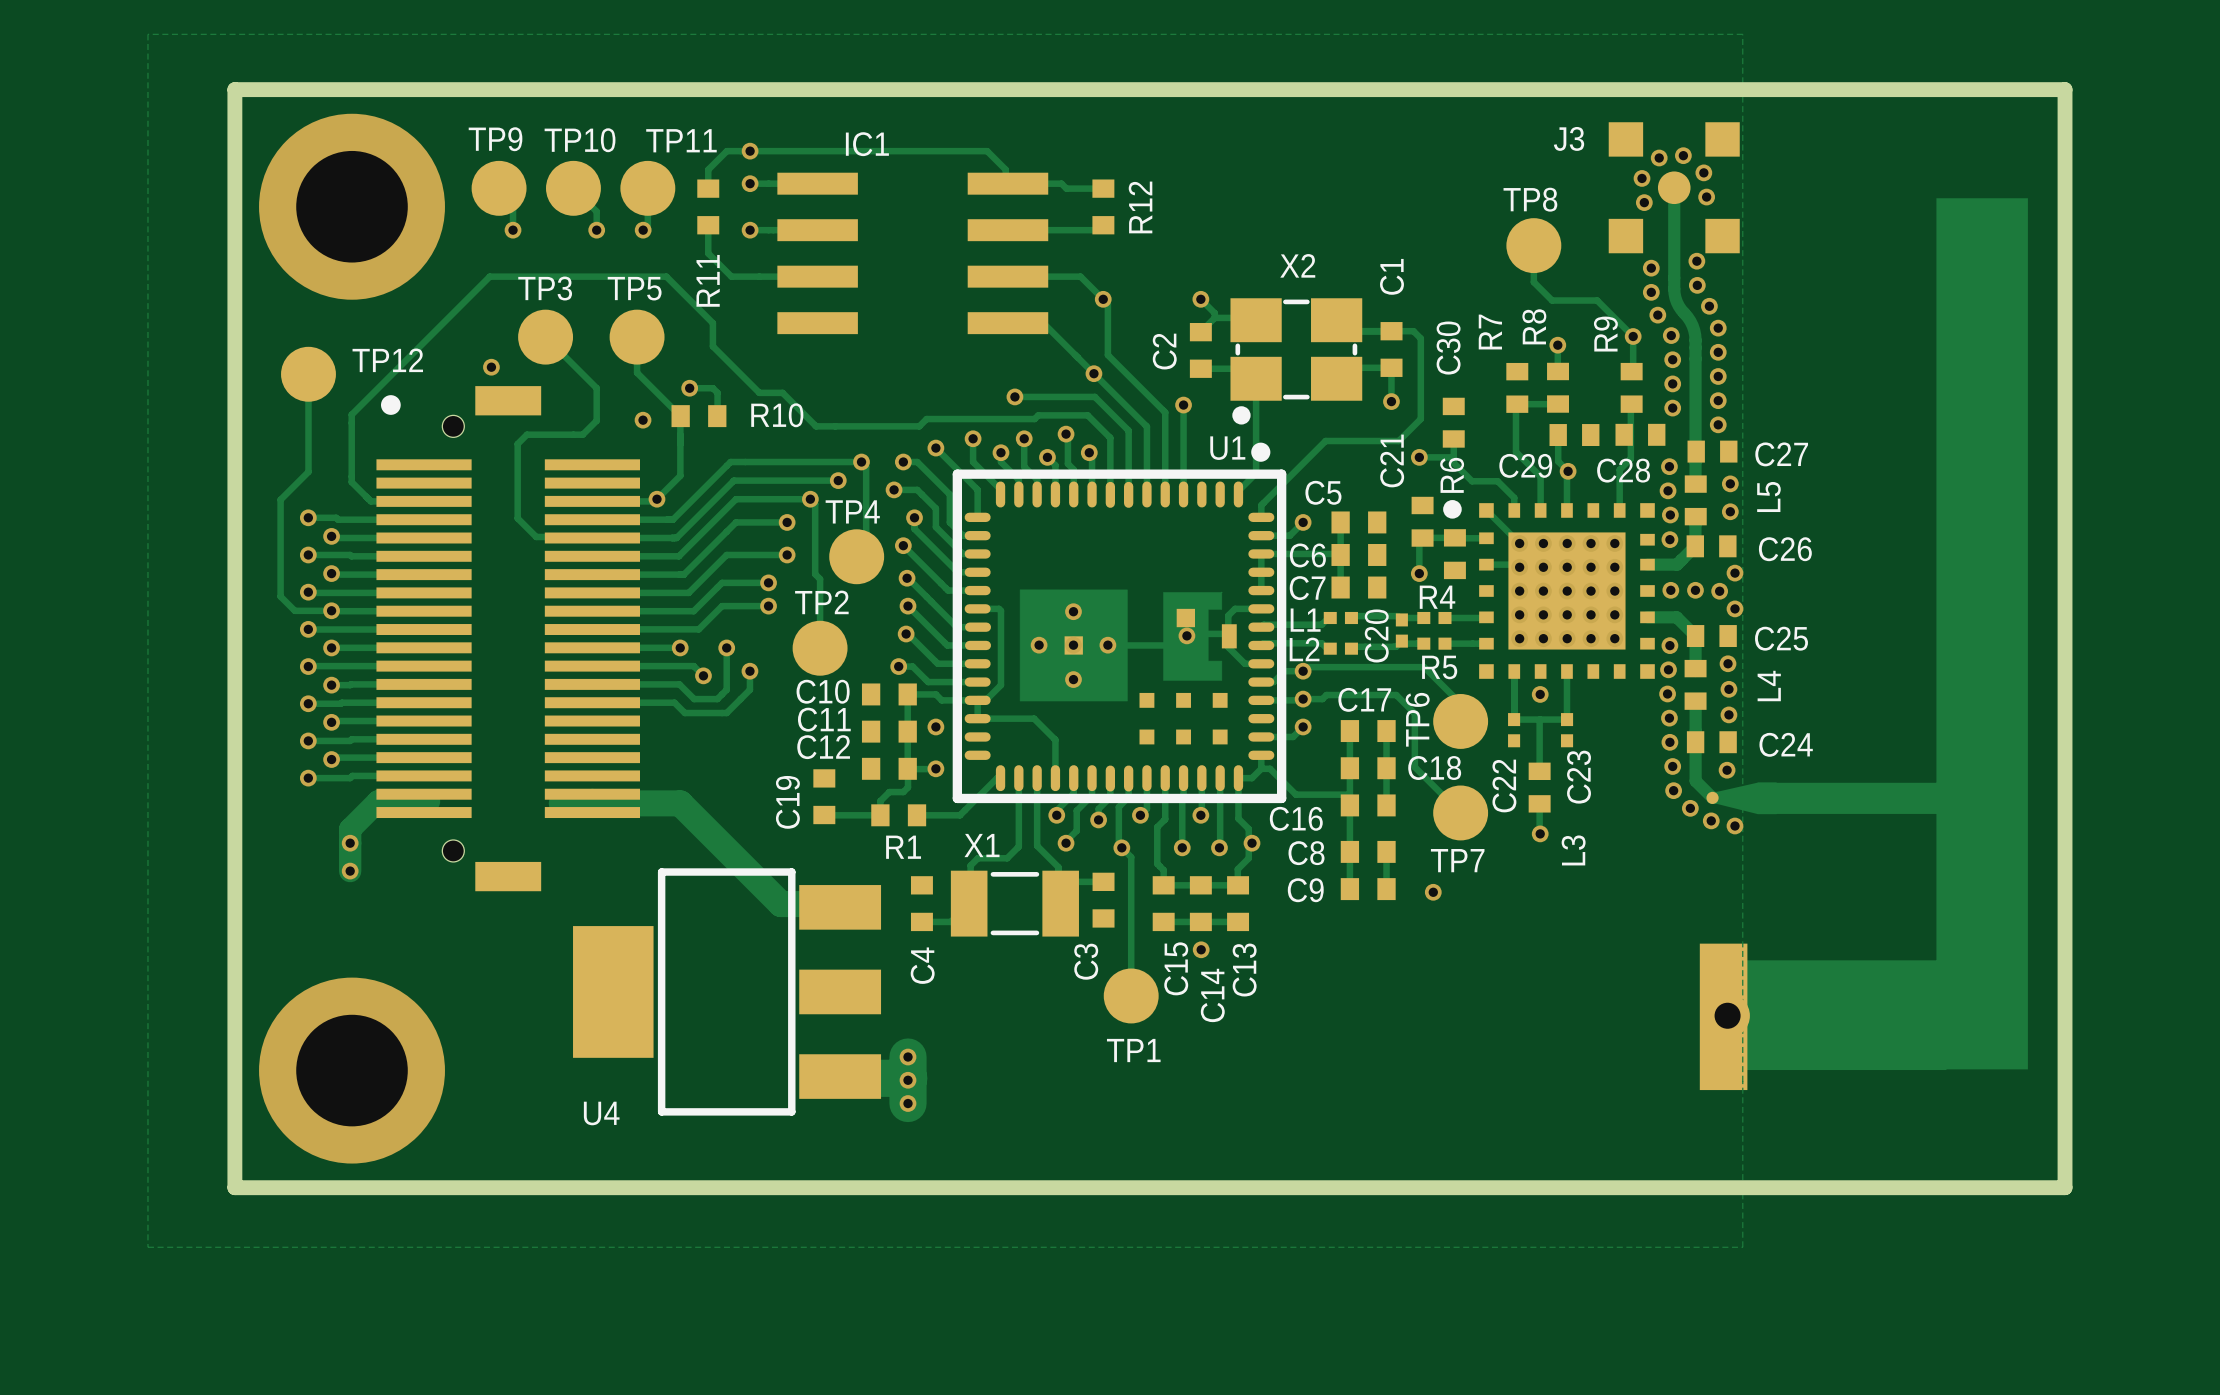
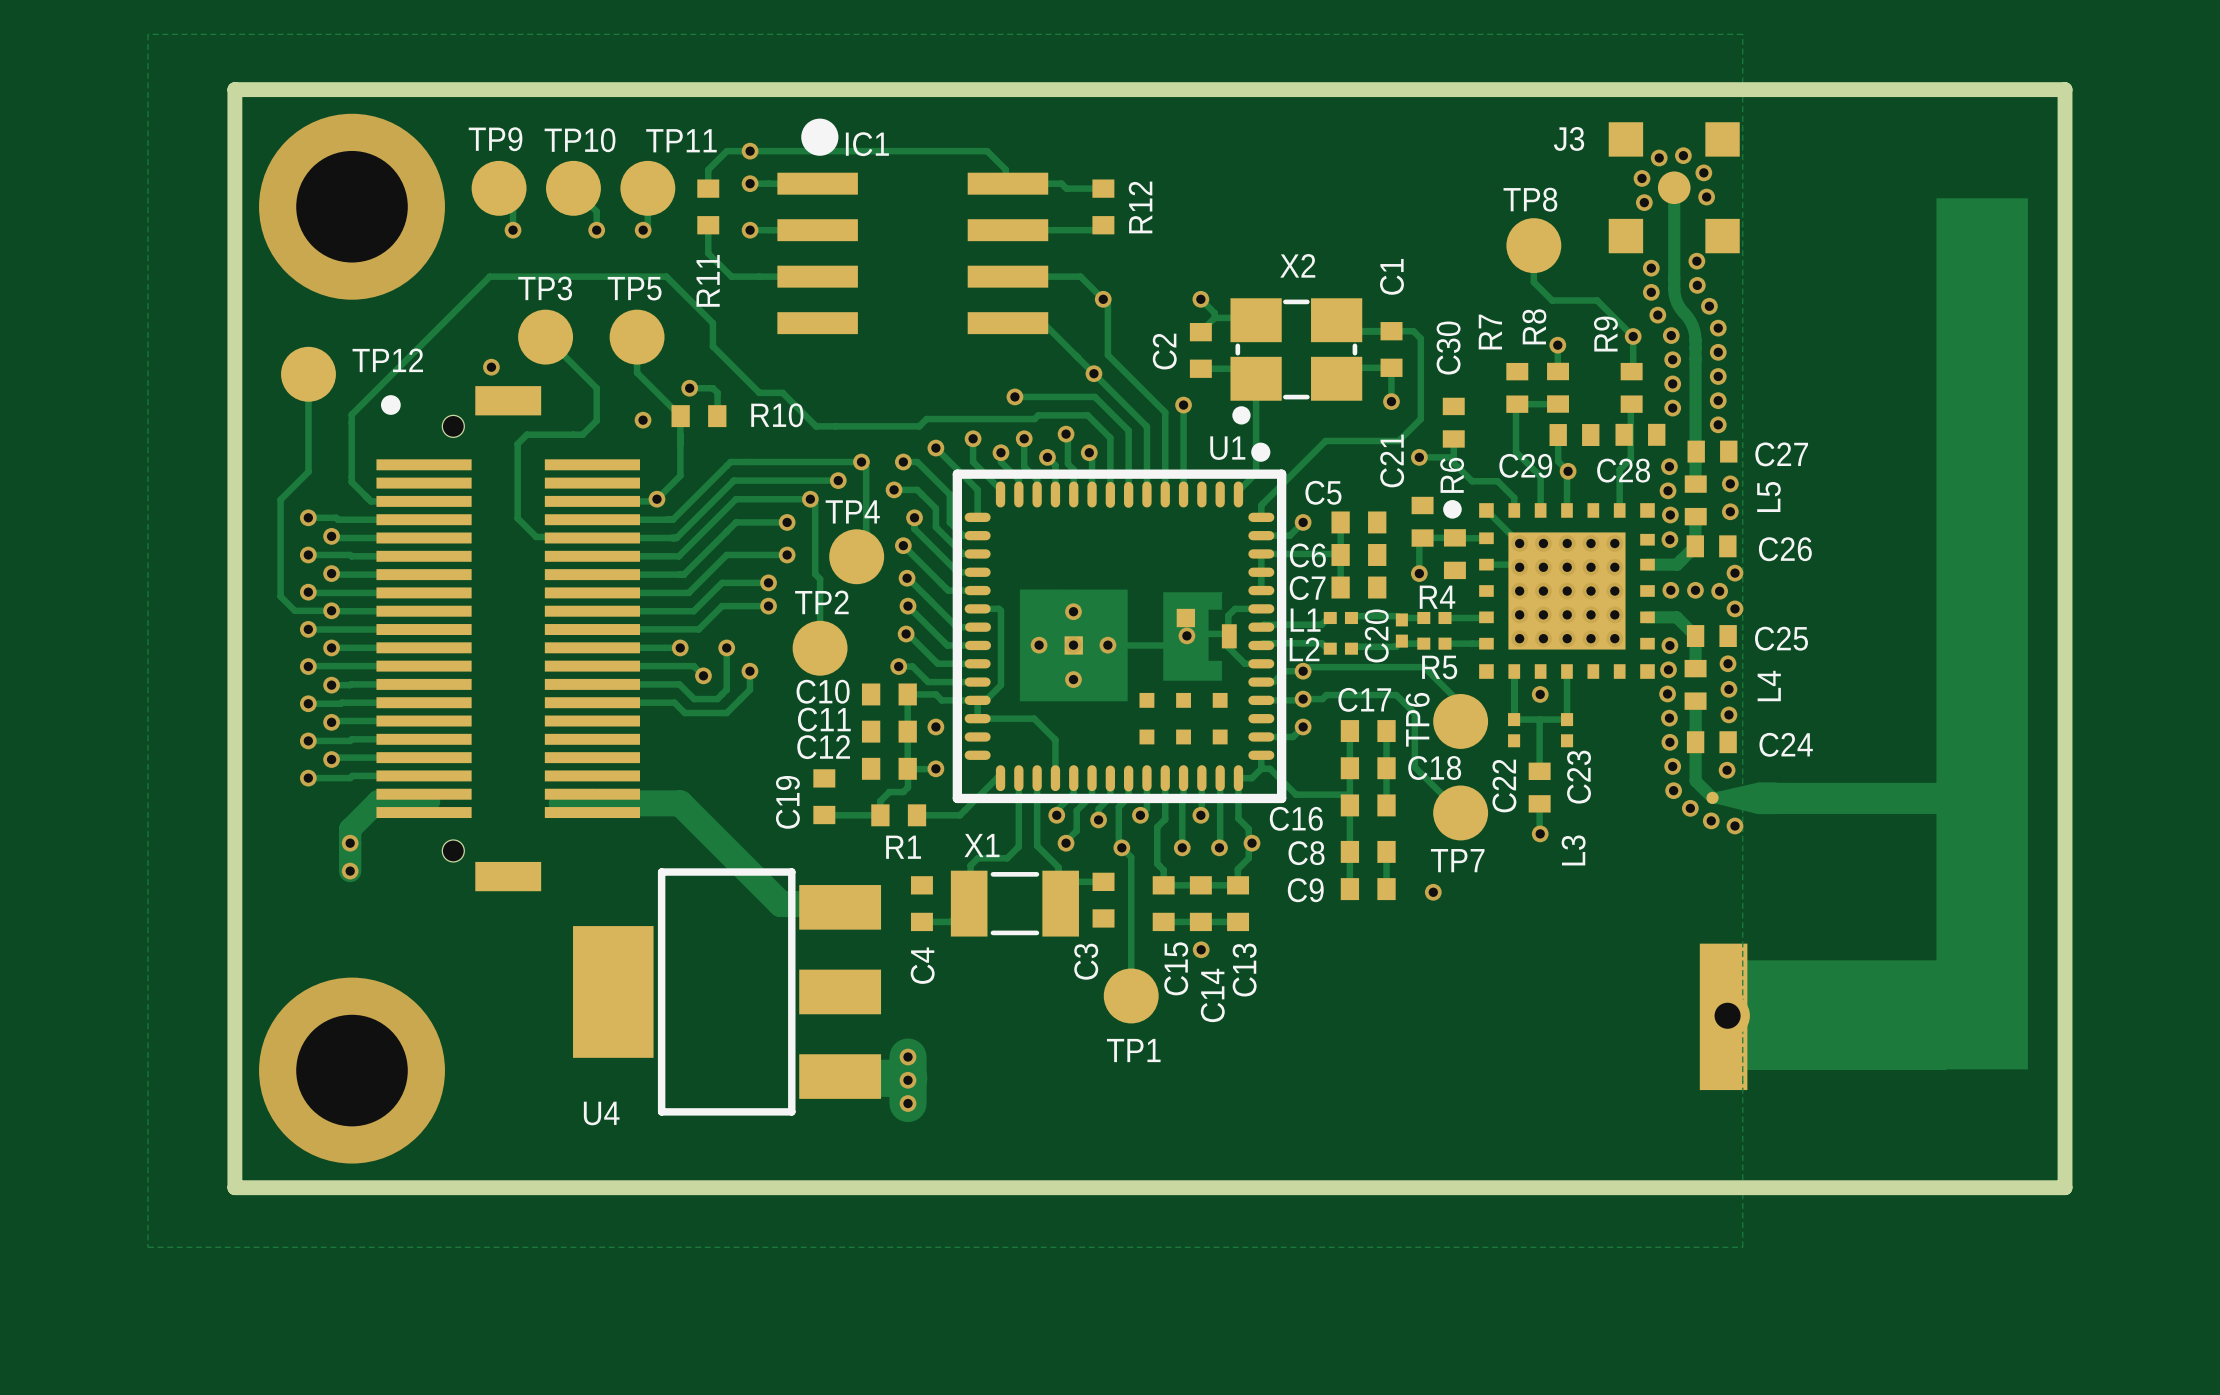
IC1 footprint: [777, 172, 1049, 335] -> [777, 118, 1049, 335]

